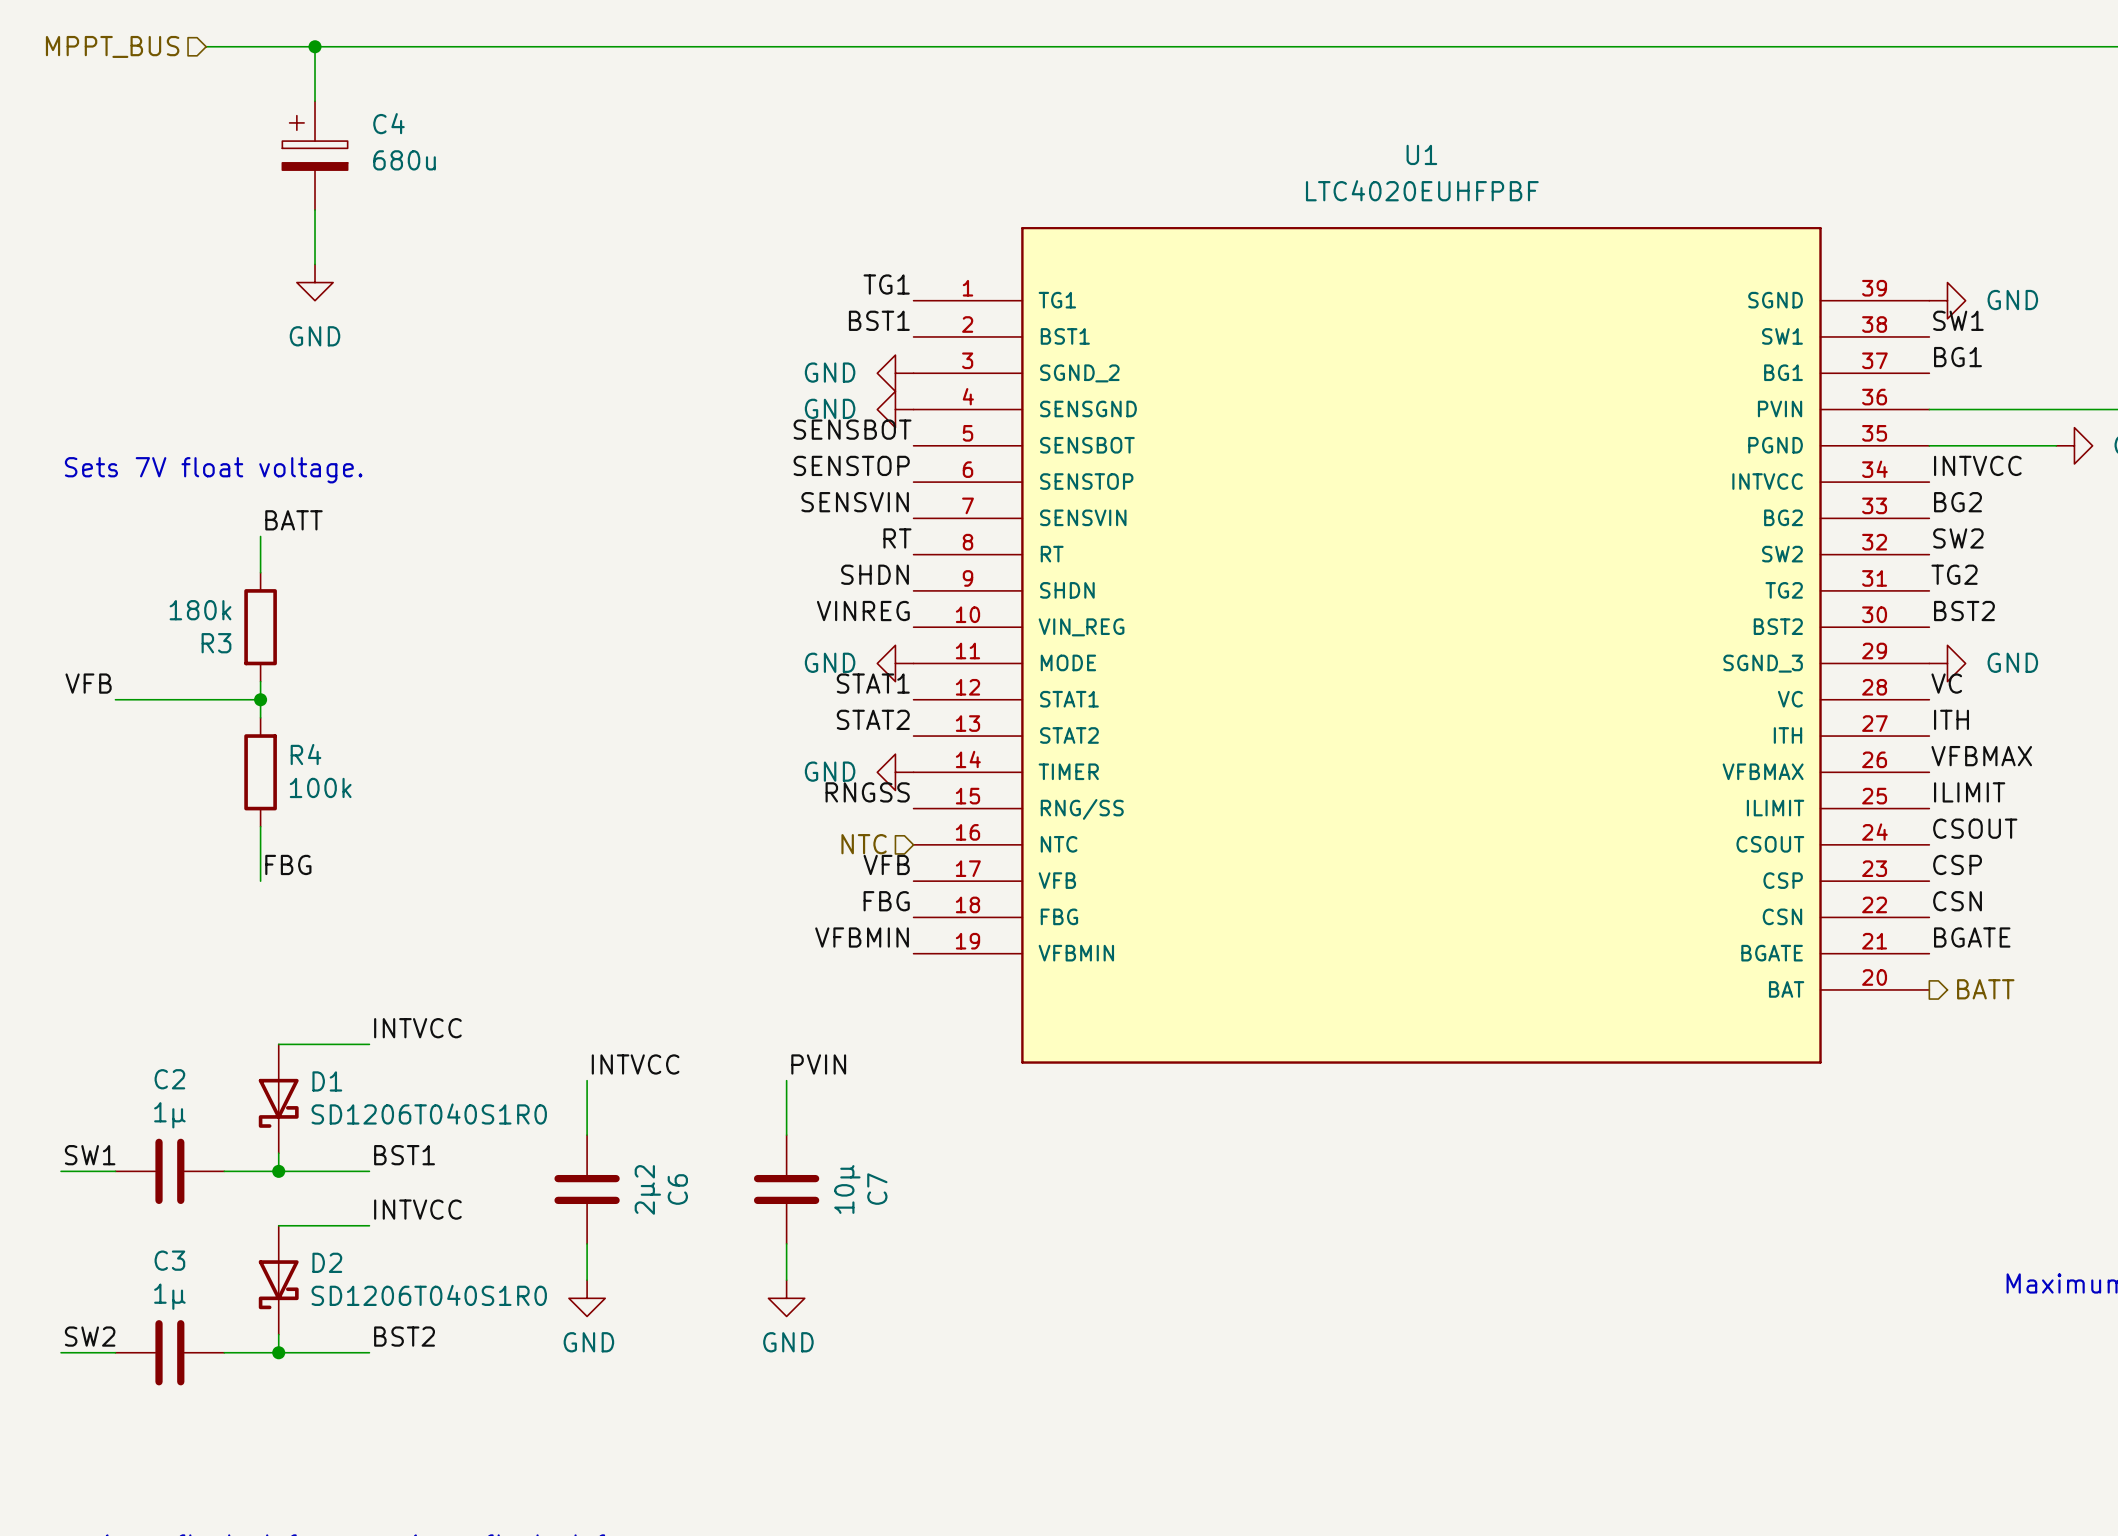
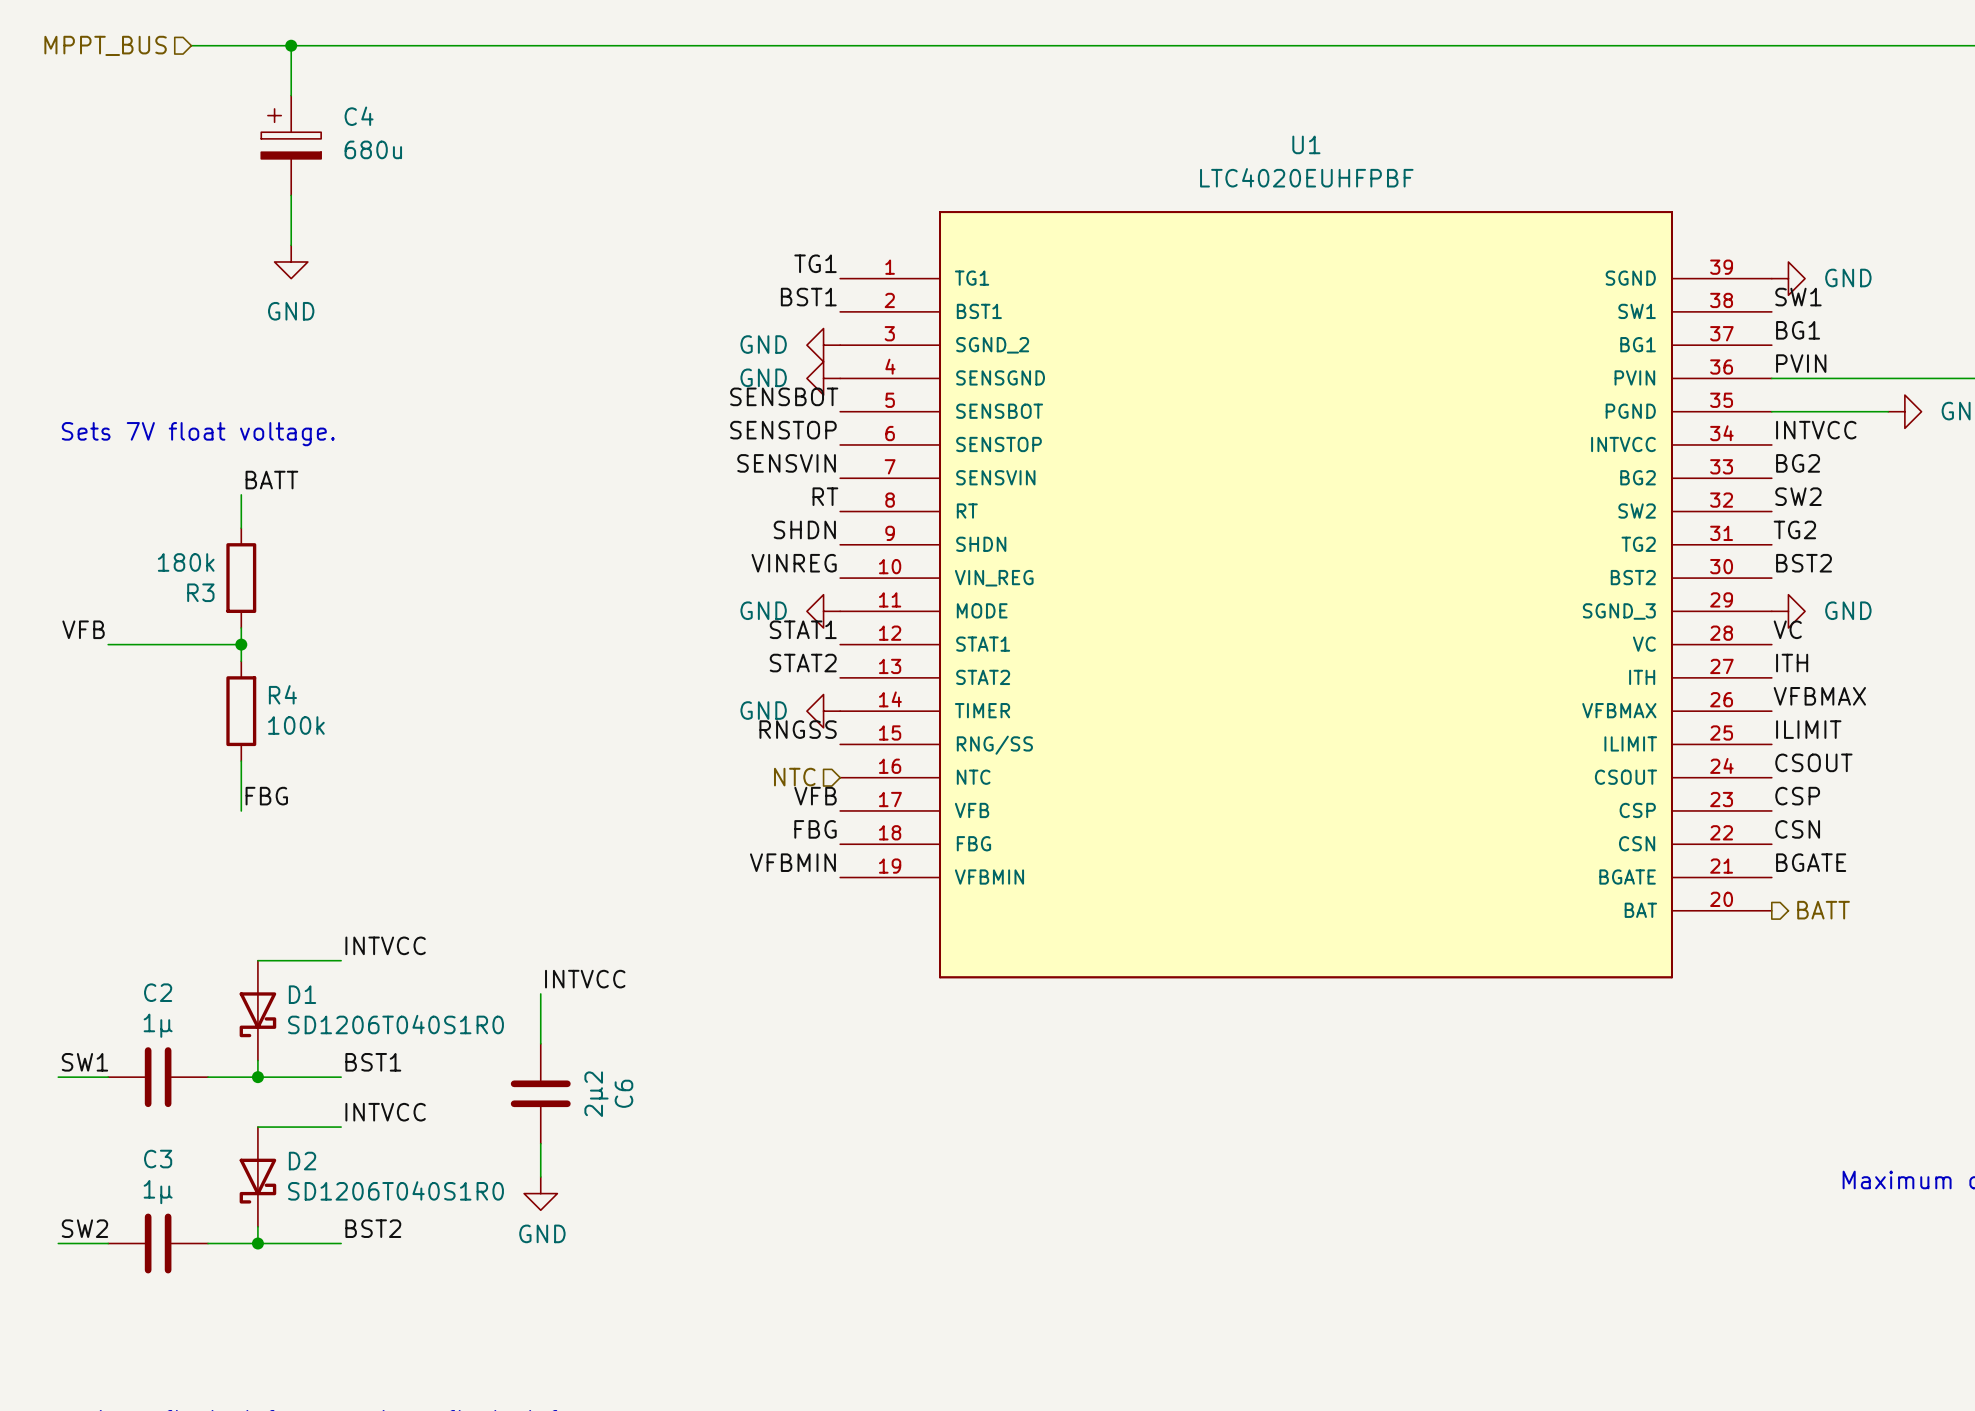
label: none -> PVIN (1801, 363)
label: PVIN (818, 1064) -> none
wire: (786, 1080) (786, 1135) -> none
C7: 10µ (786, 1189) -> none
wire: (786, 1243) (786, 1280) -> none
power symbol: GND (786, 1298) -> none

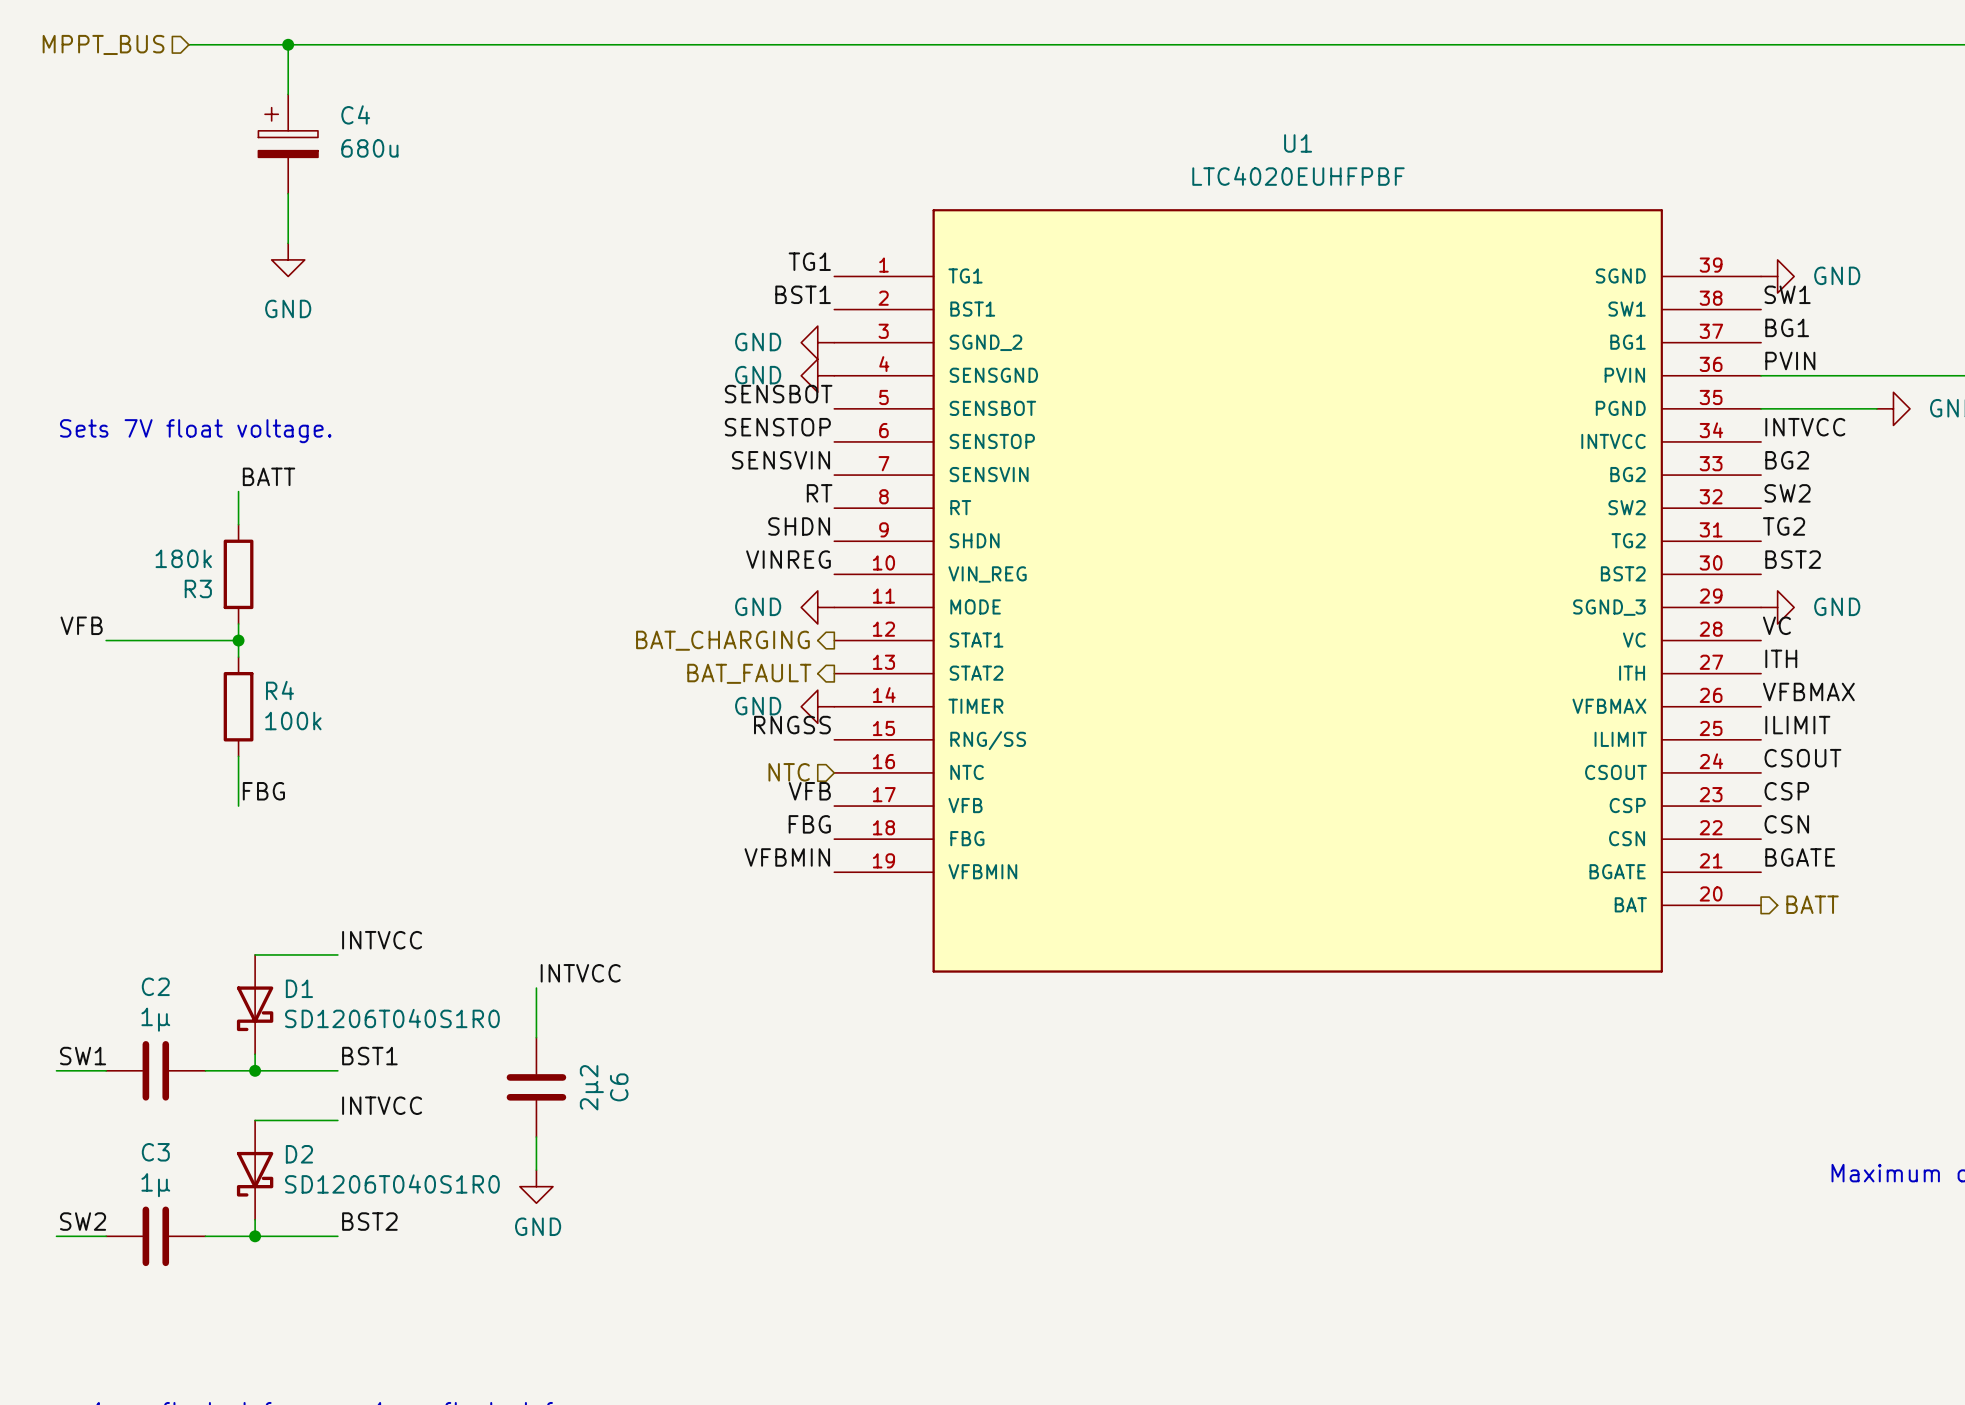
label: STAT1 (803, 629) -> none
hierarchical label: none -> BAT_CHARGING (722, 640)
label: STAT2 (803, 663) -> none
hierarchical label: none -> BAT_FAULT (749, 673)

